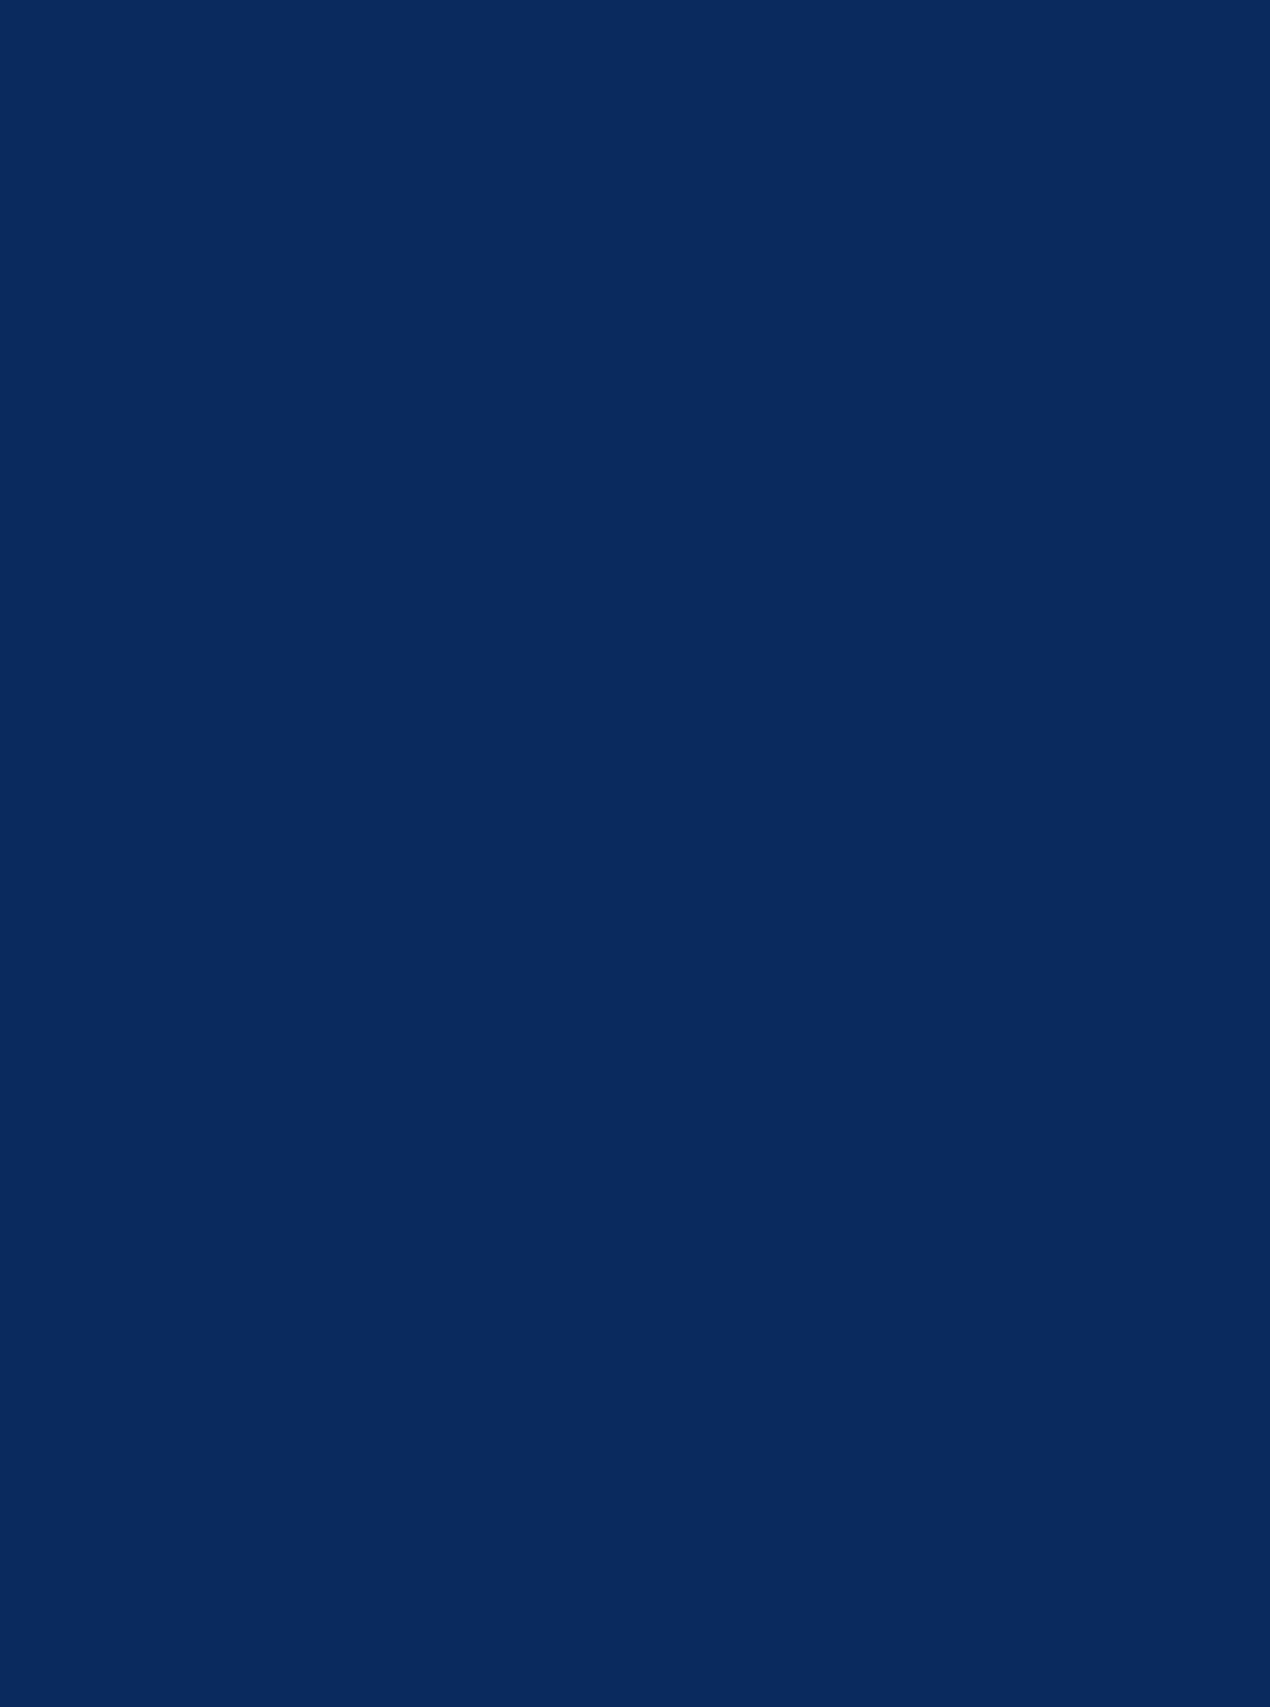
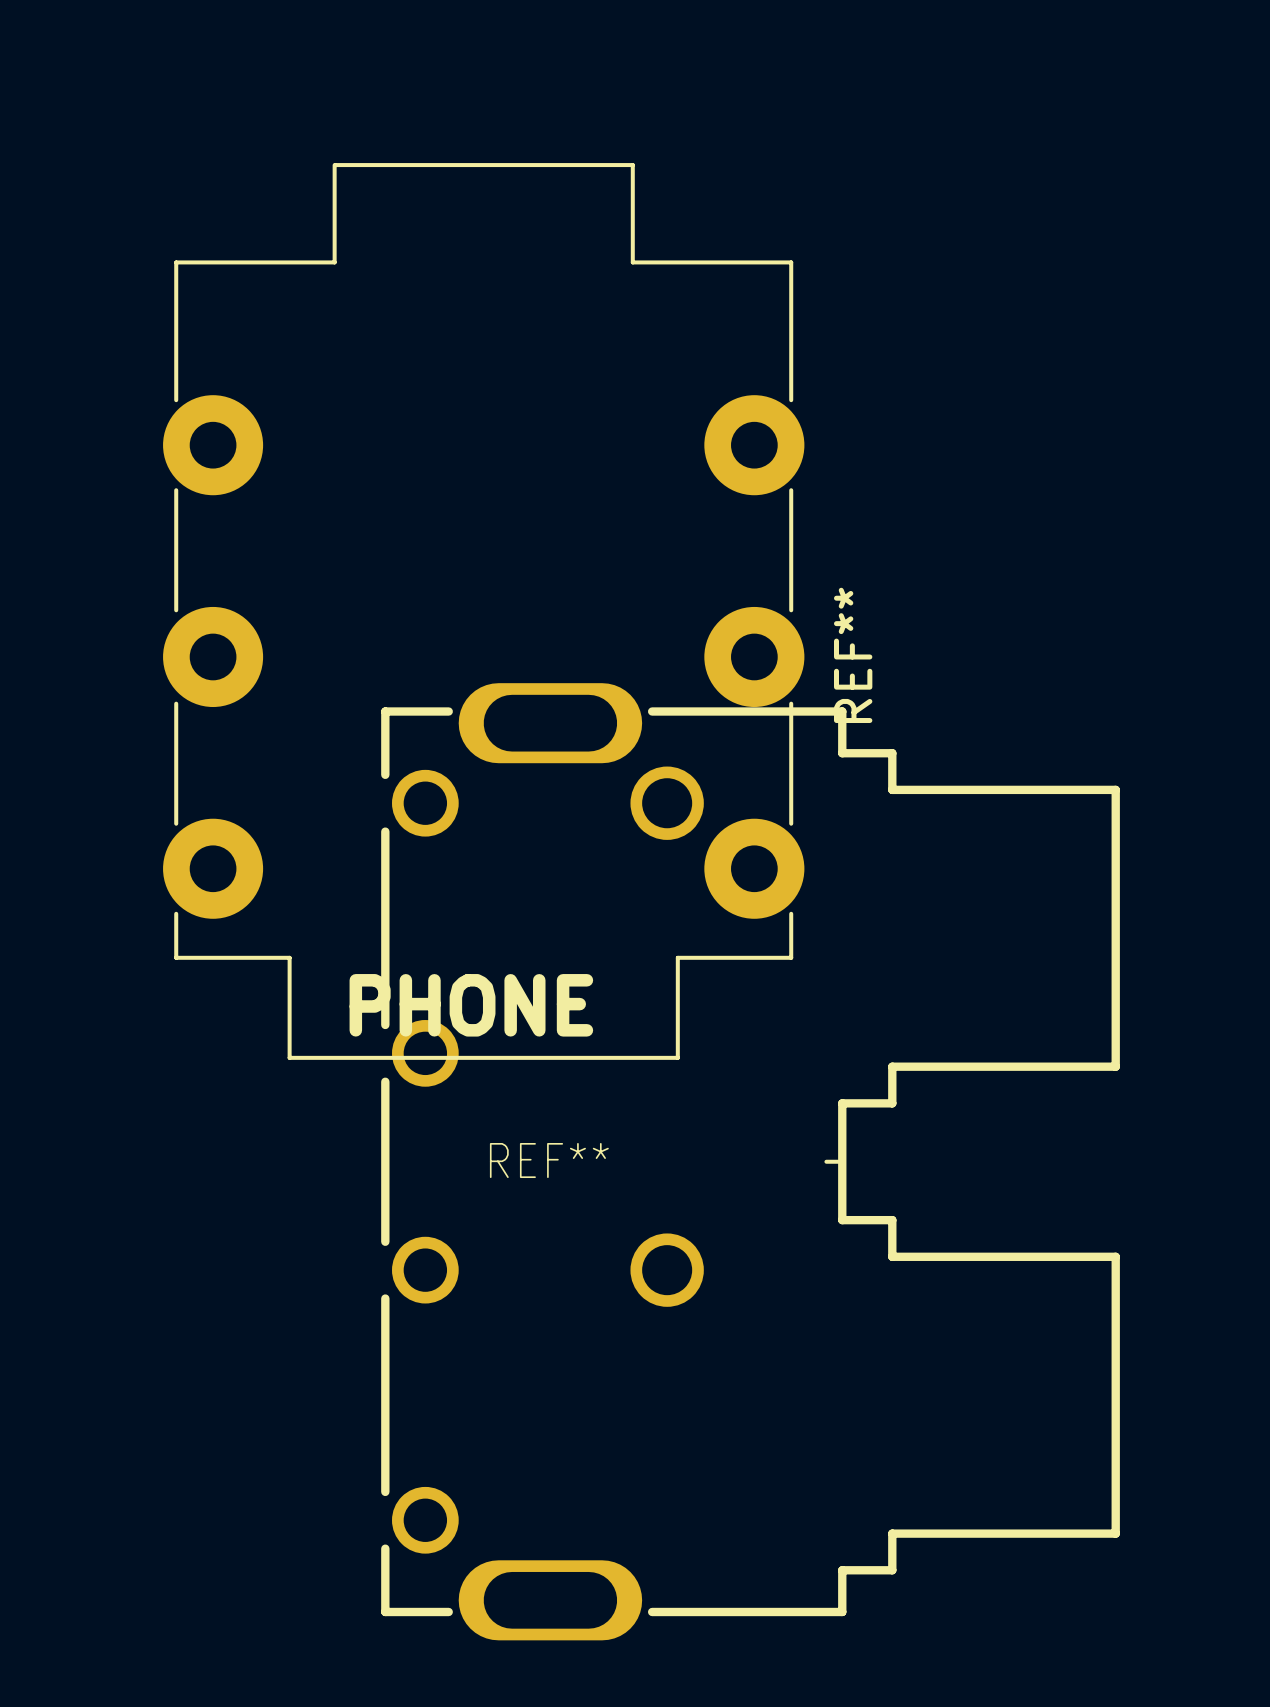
REF**: none -> (483, 611)
REF**: none -> (750, 1161)

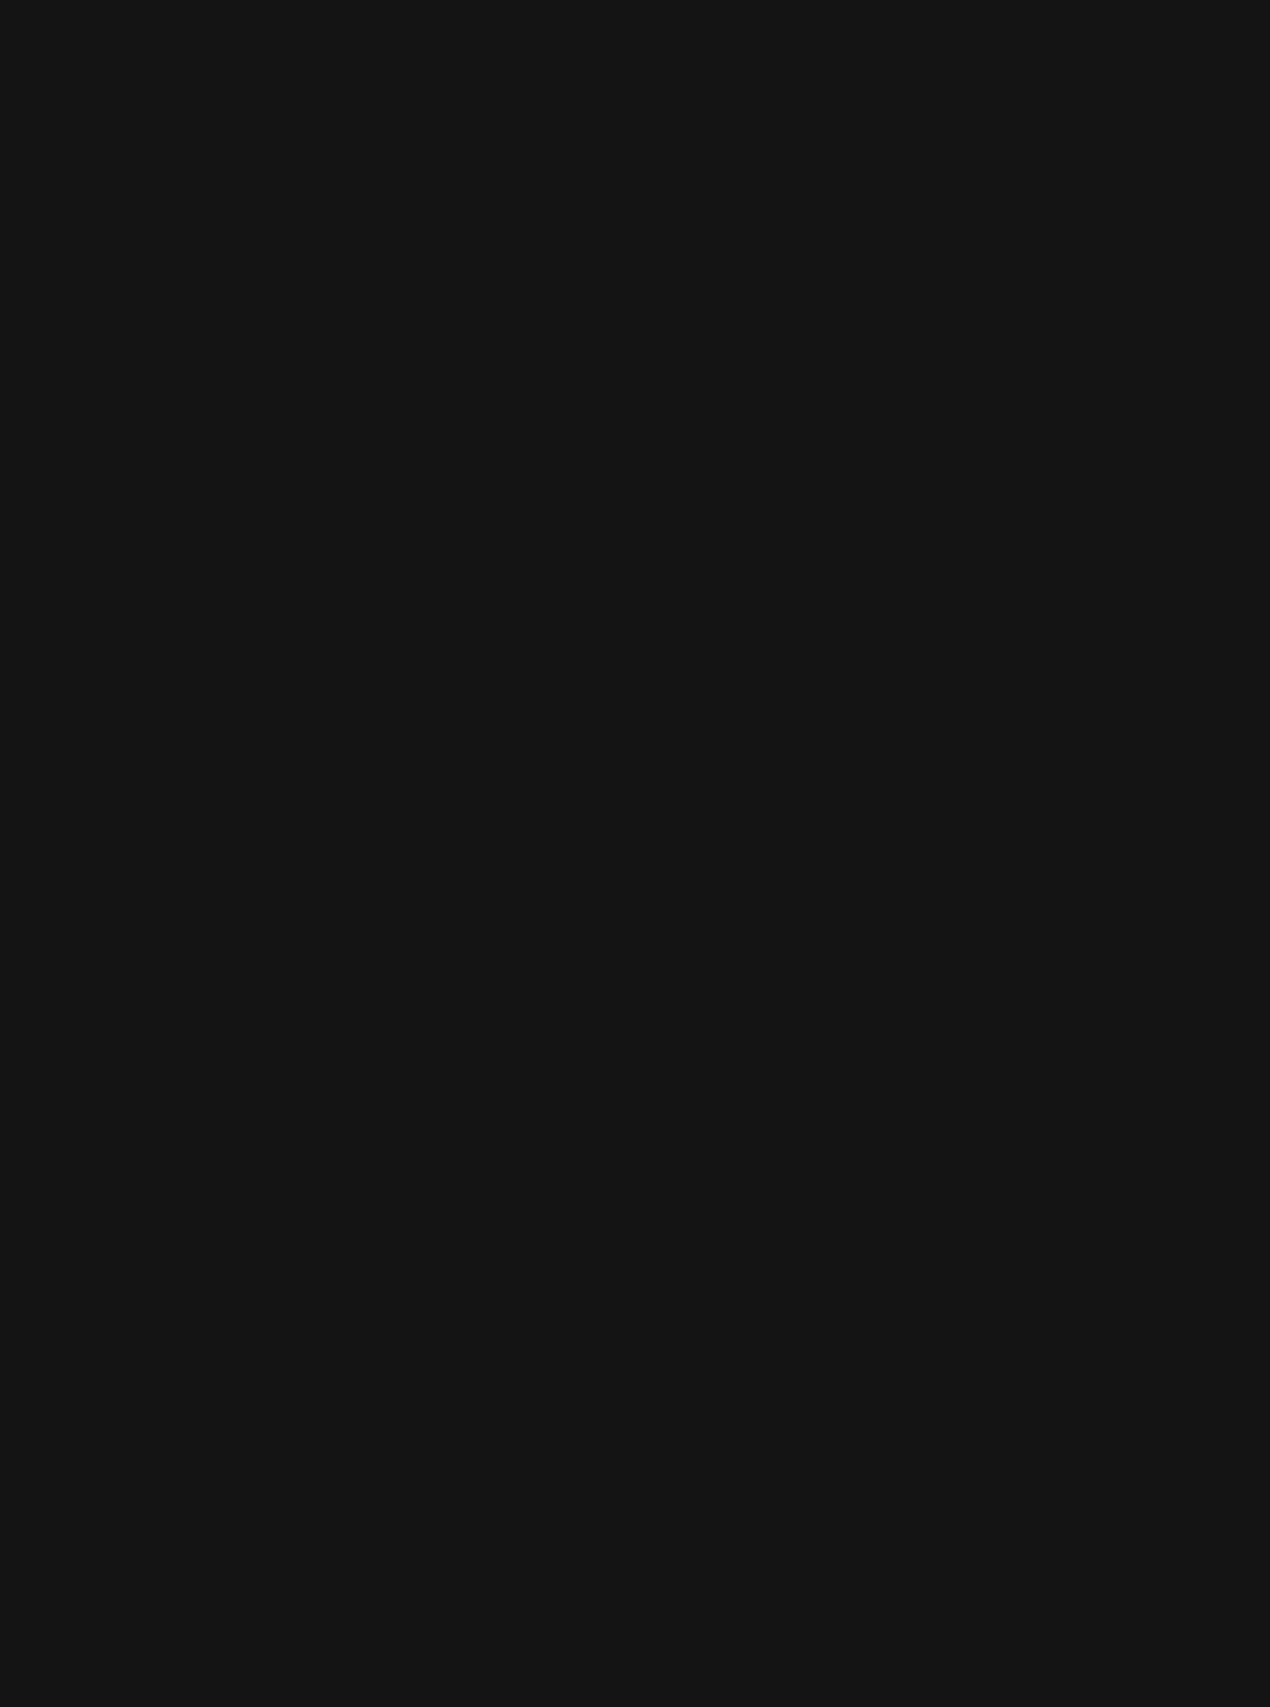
REF**: (483, 611) -> none
REF**: (750, 1161) -> none

